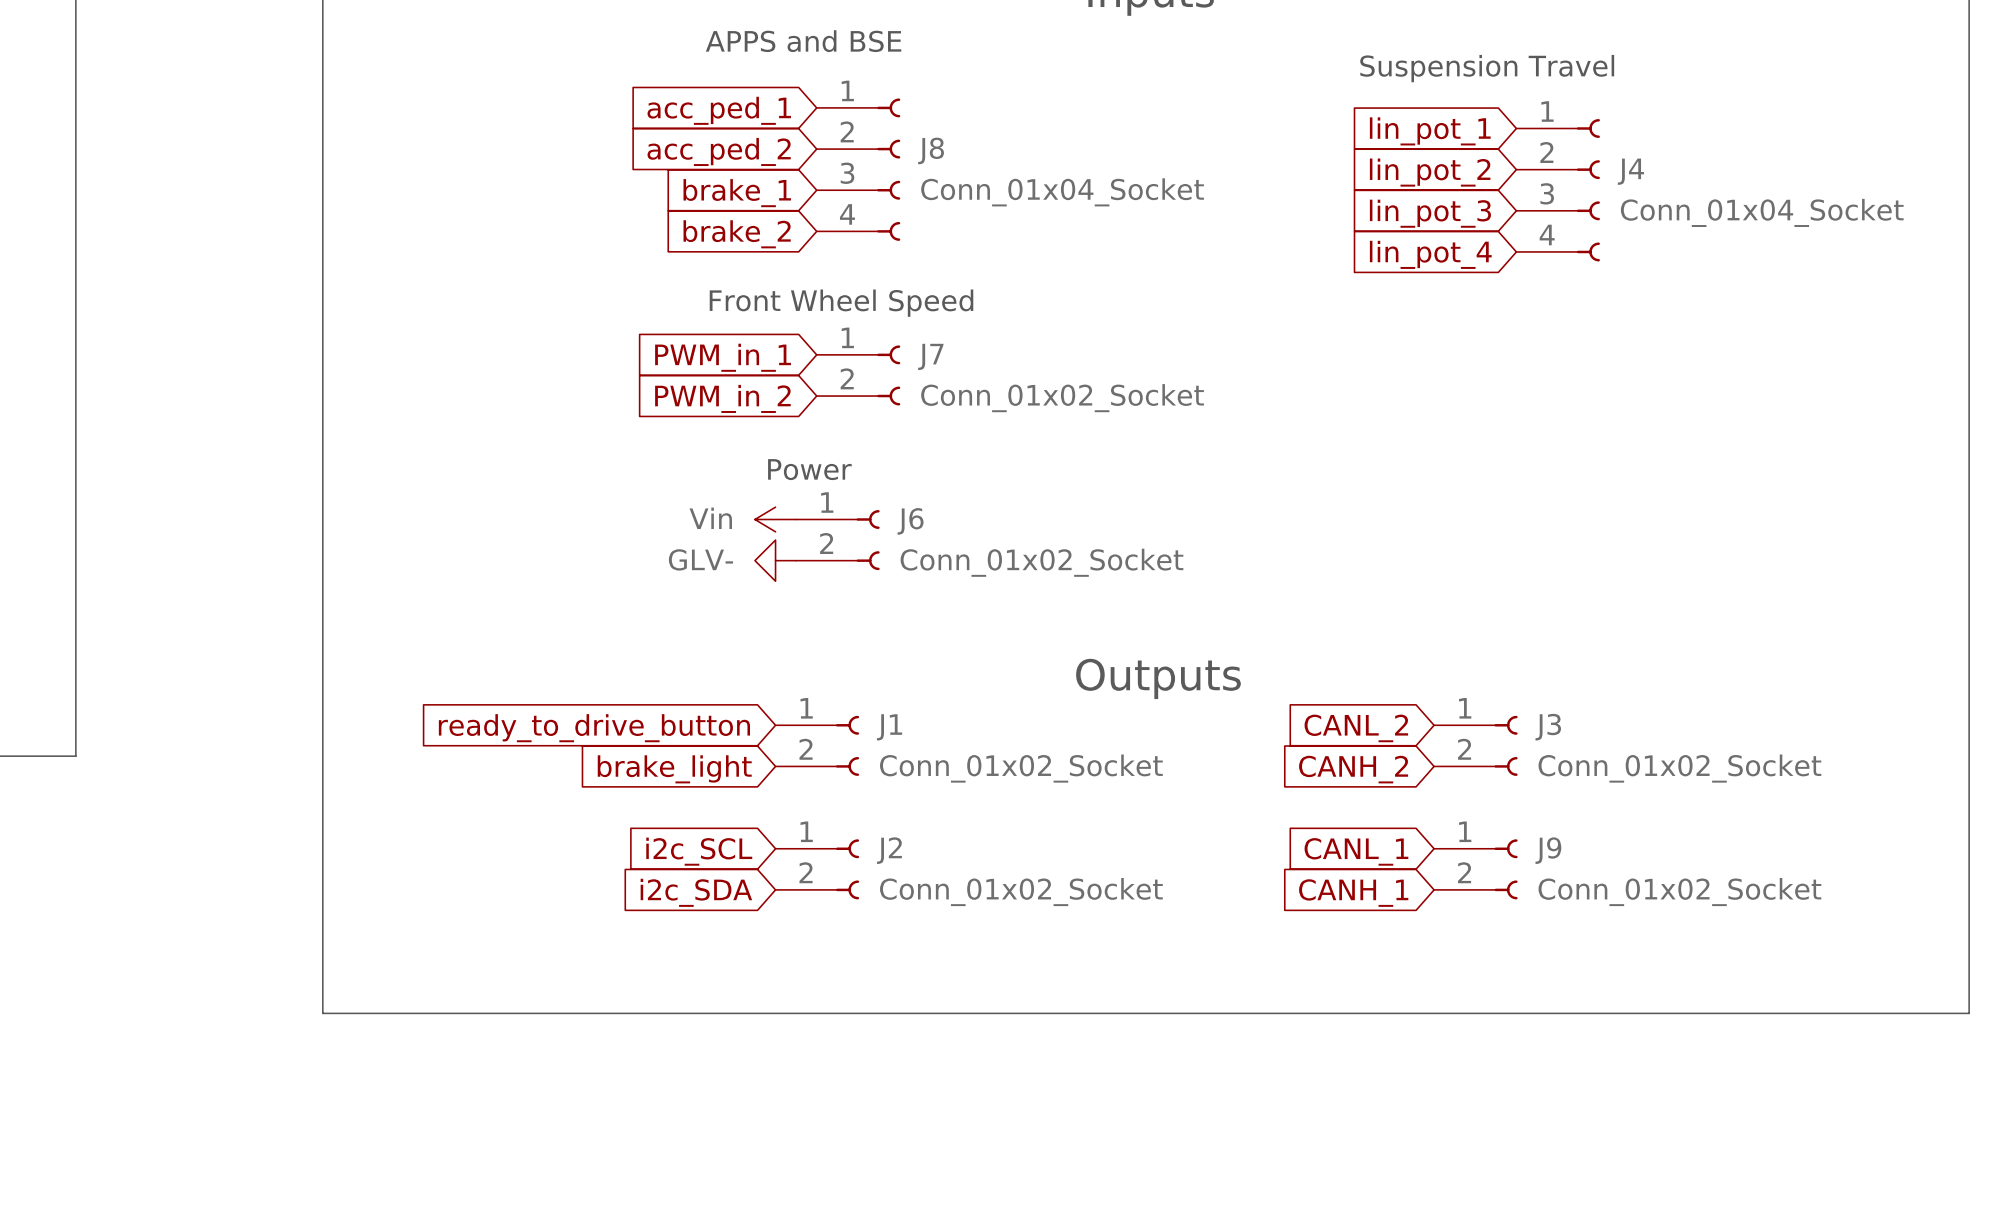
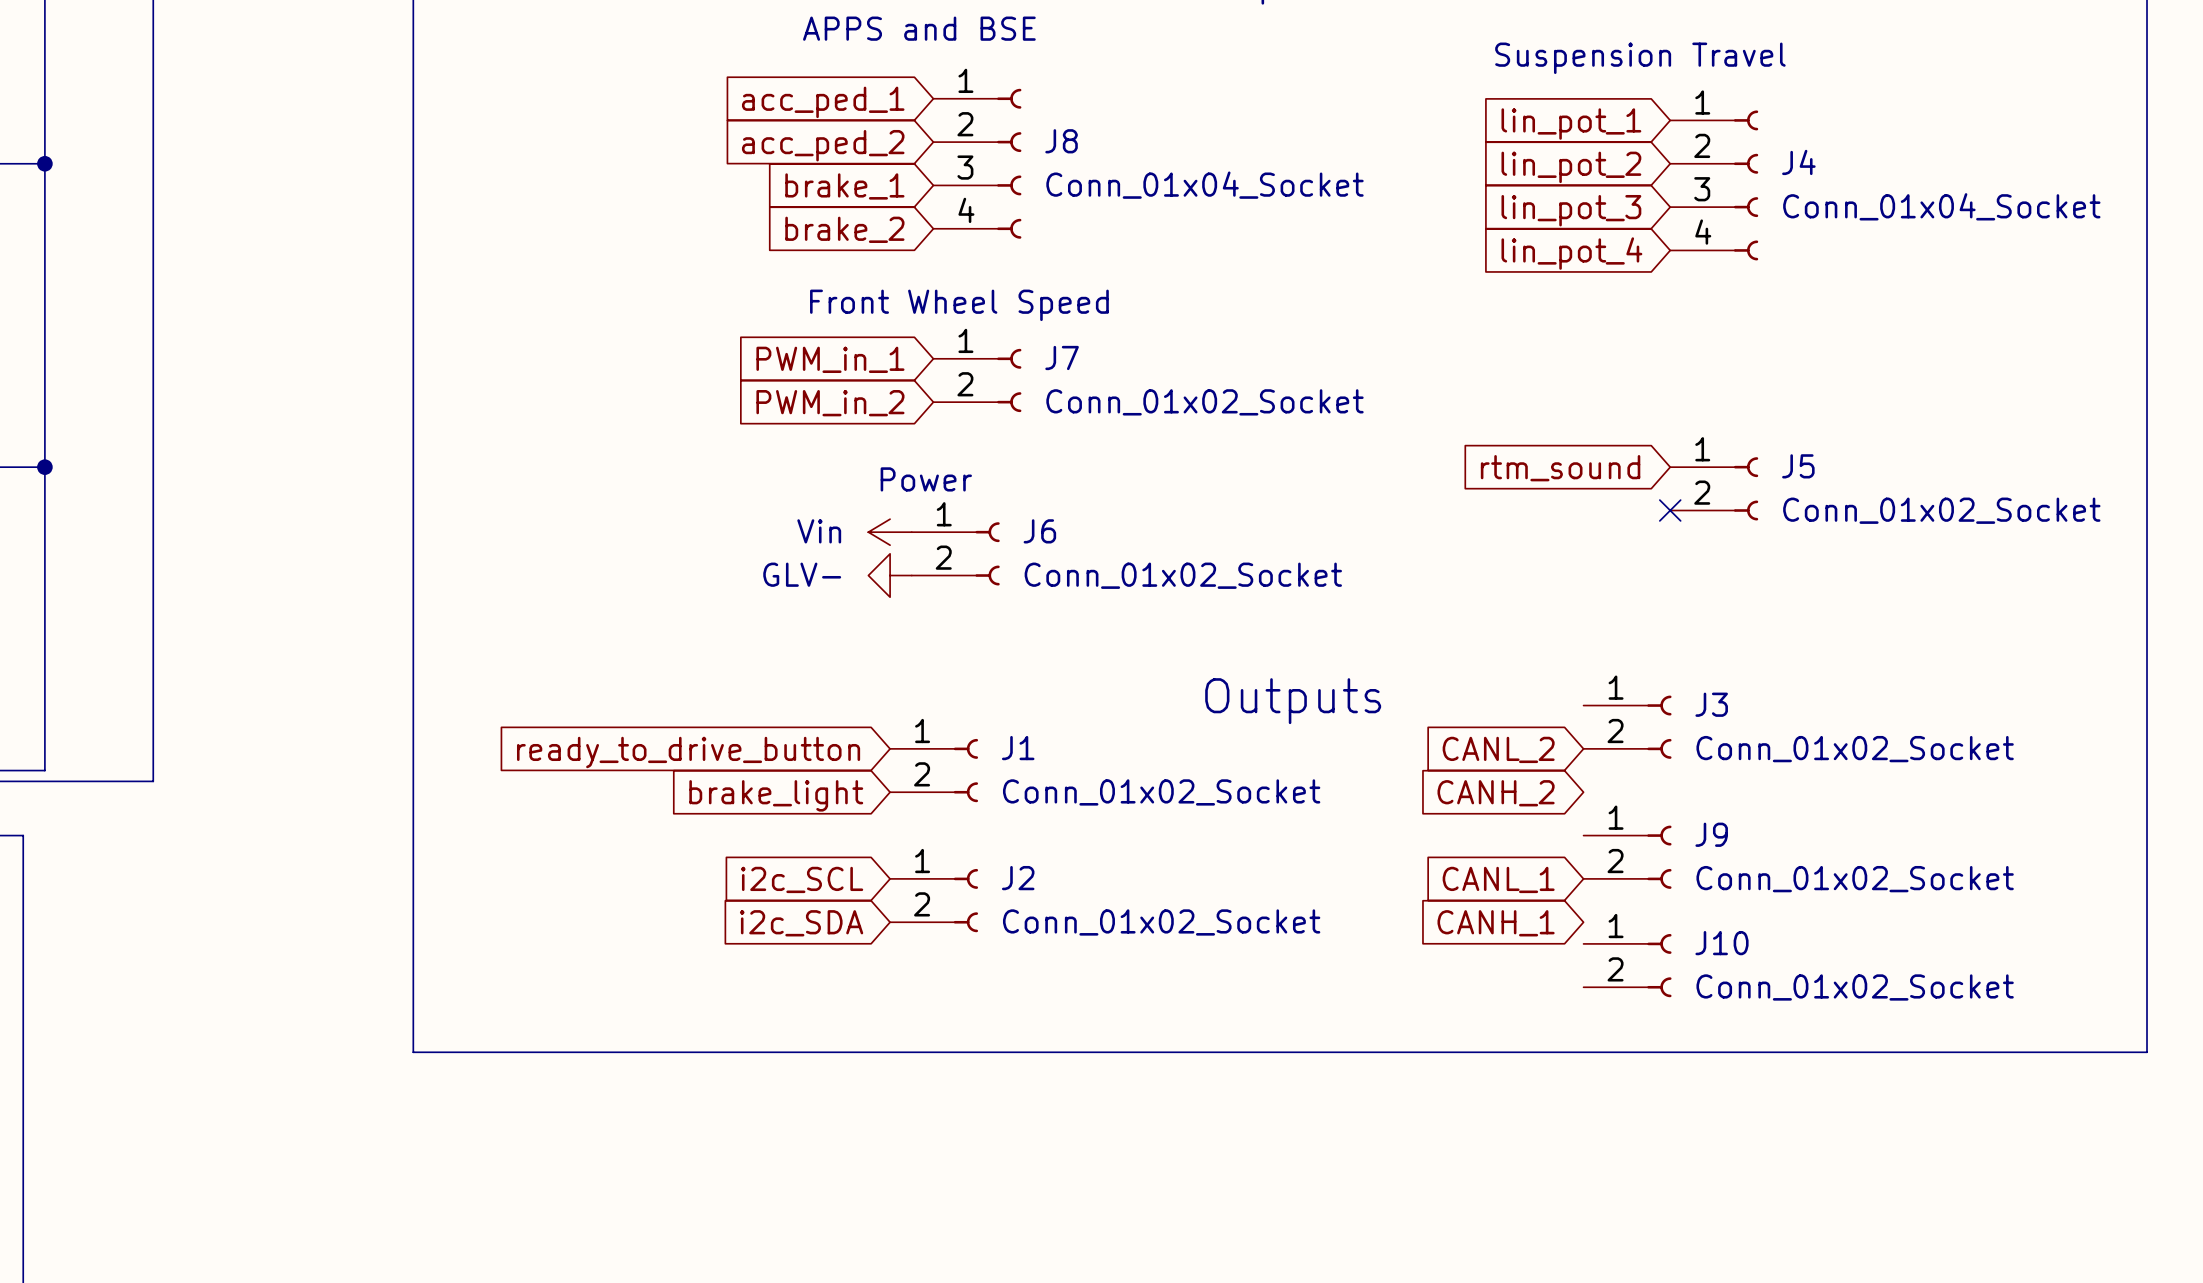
global label: none -> rtm_sound (1560, 468)
J5: none -> Conn_01x02_Socket (1714, 488)
no-connect mark: none -> (1670, 510)
J3 position: (1475, 745) -> (1627, 727)
J9 position: (1475, 869) -> (1627, 857)
J10: none -> Conn_01x02_Socket (1627, 965)

